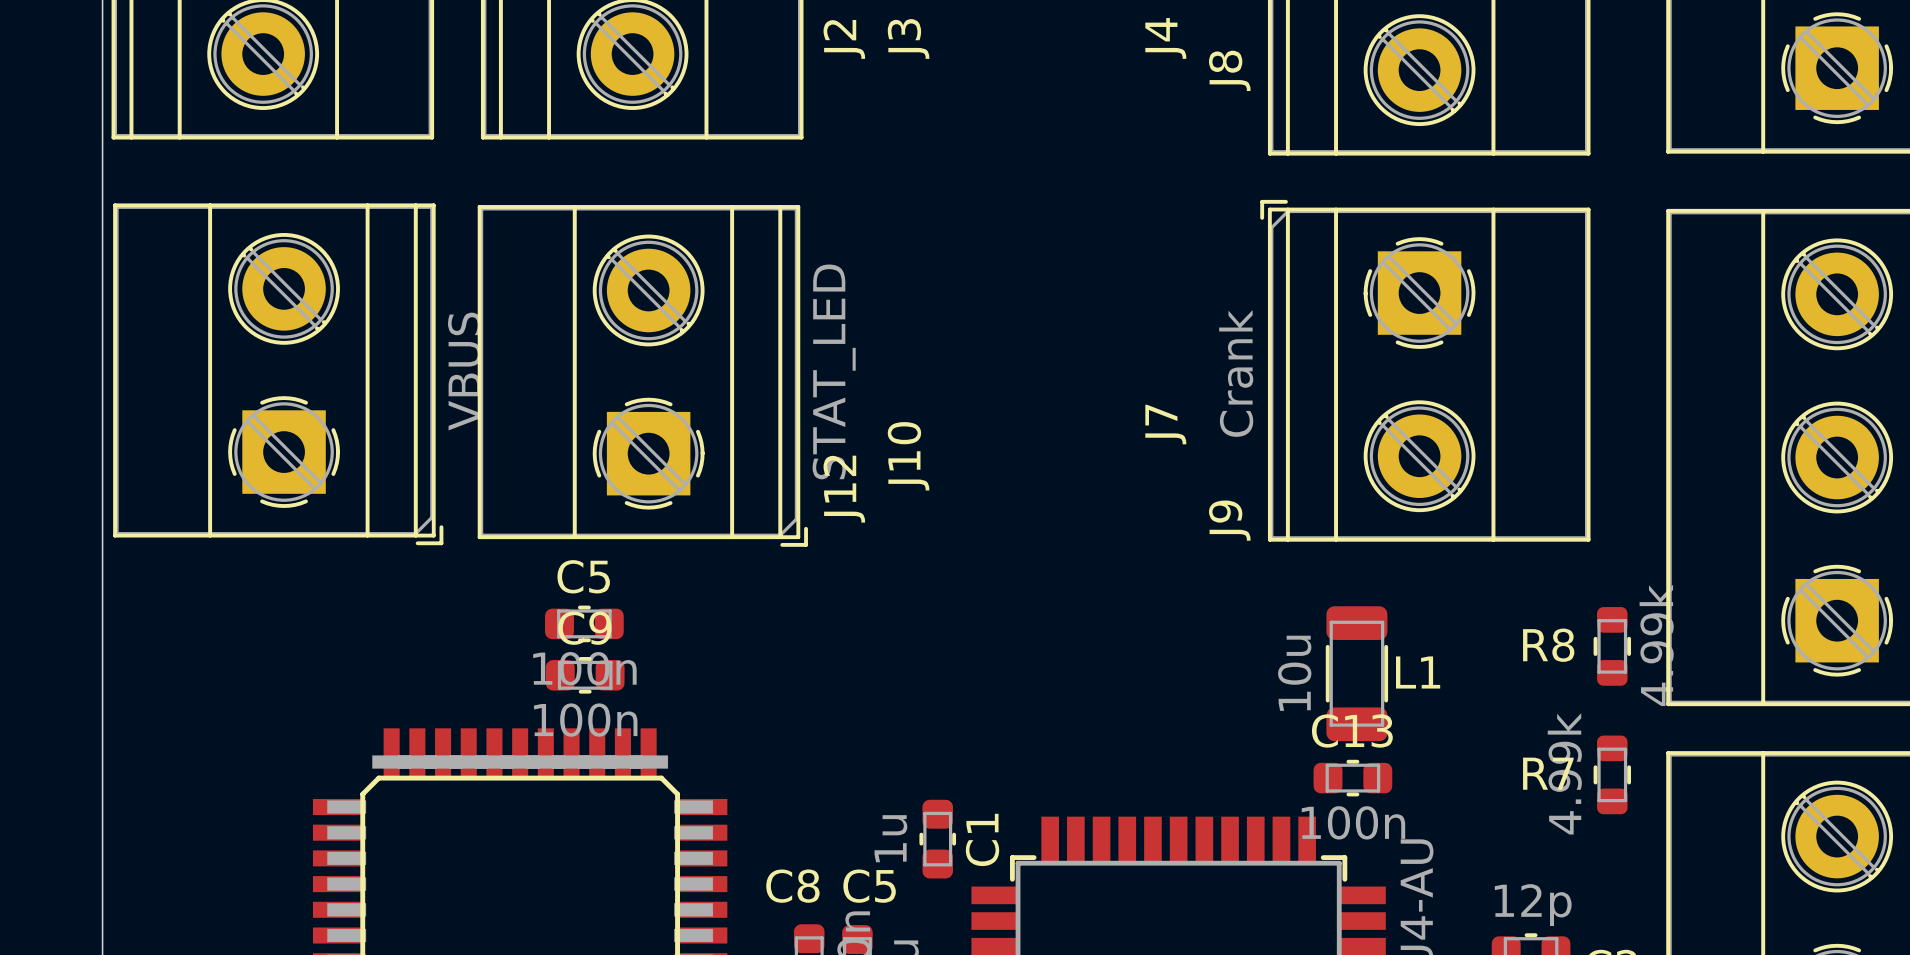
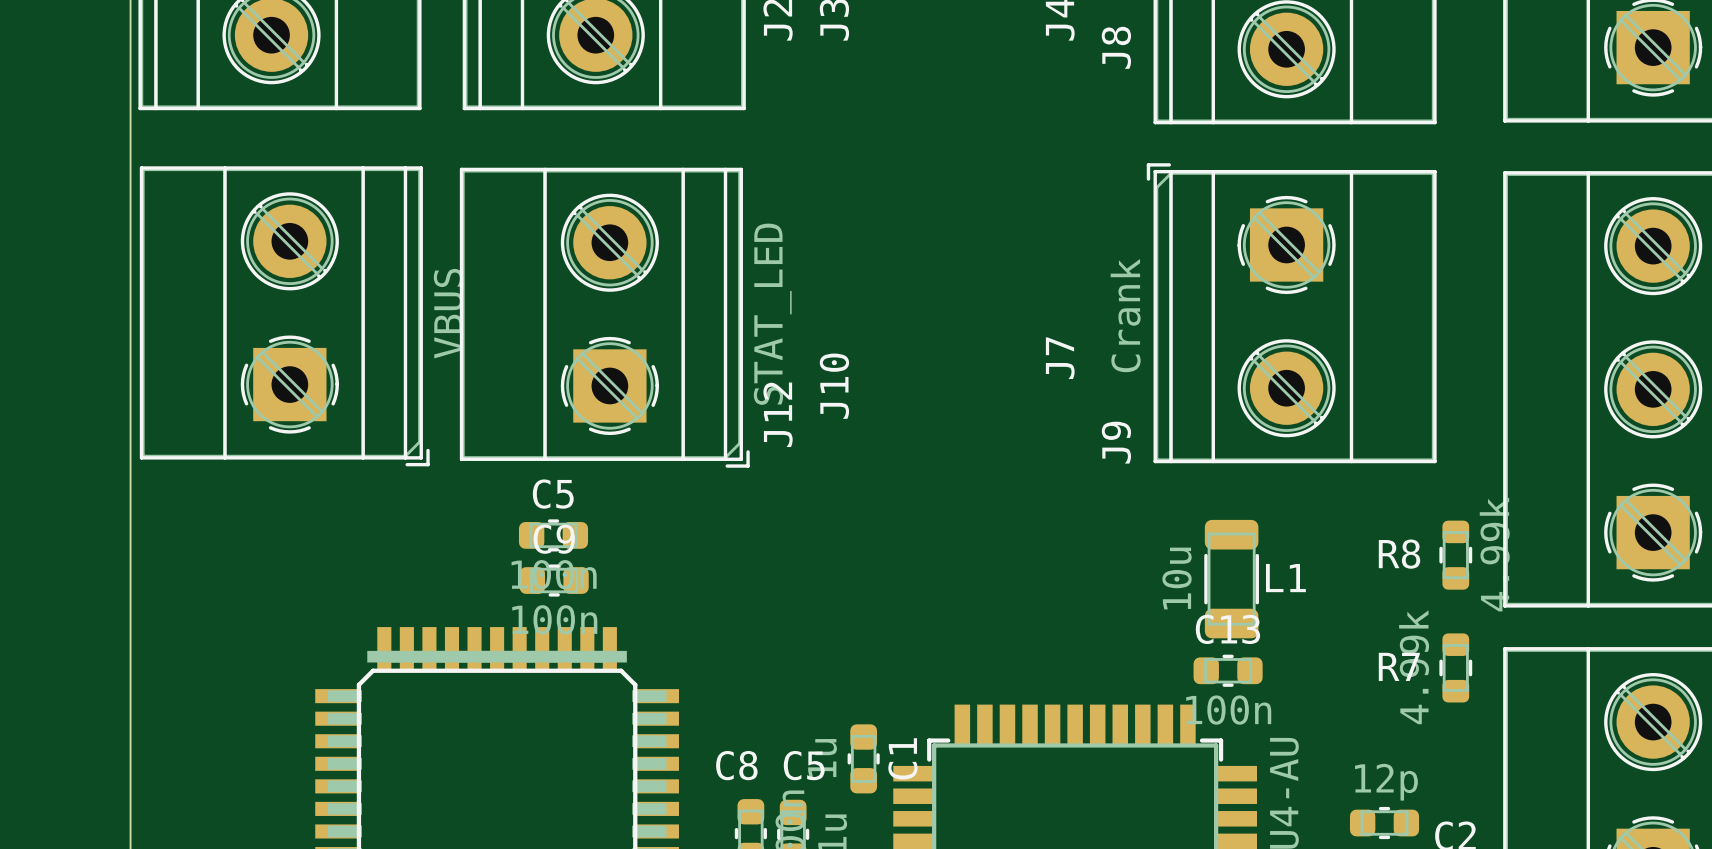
C1 position: (937, 839) -> (863, 758)

